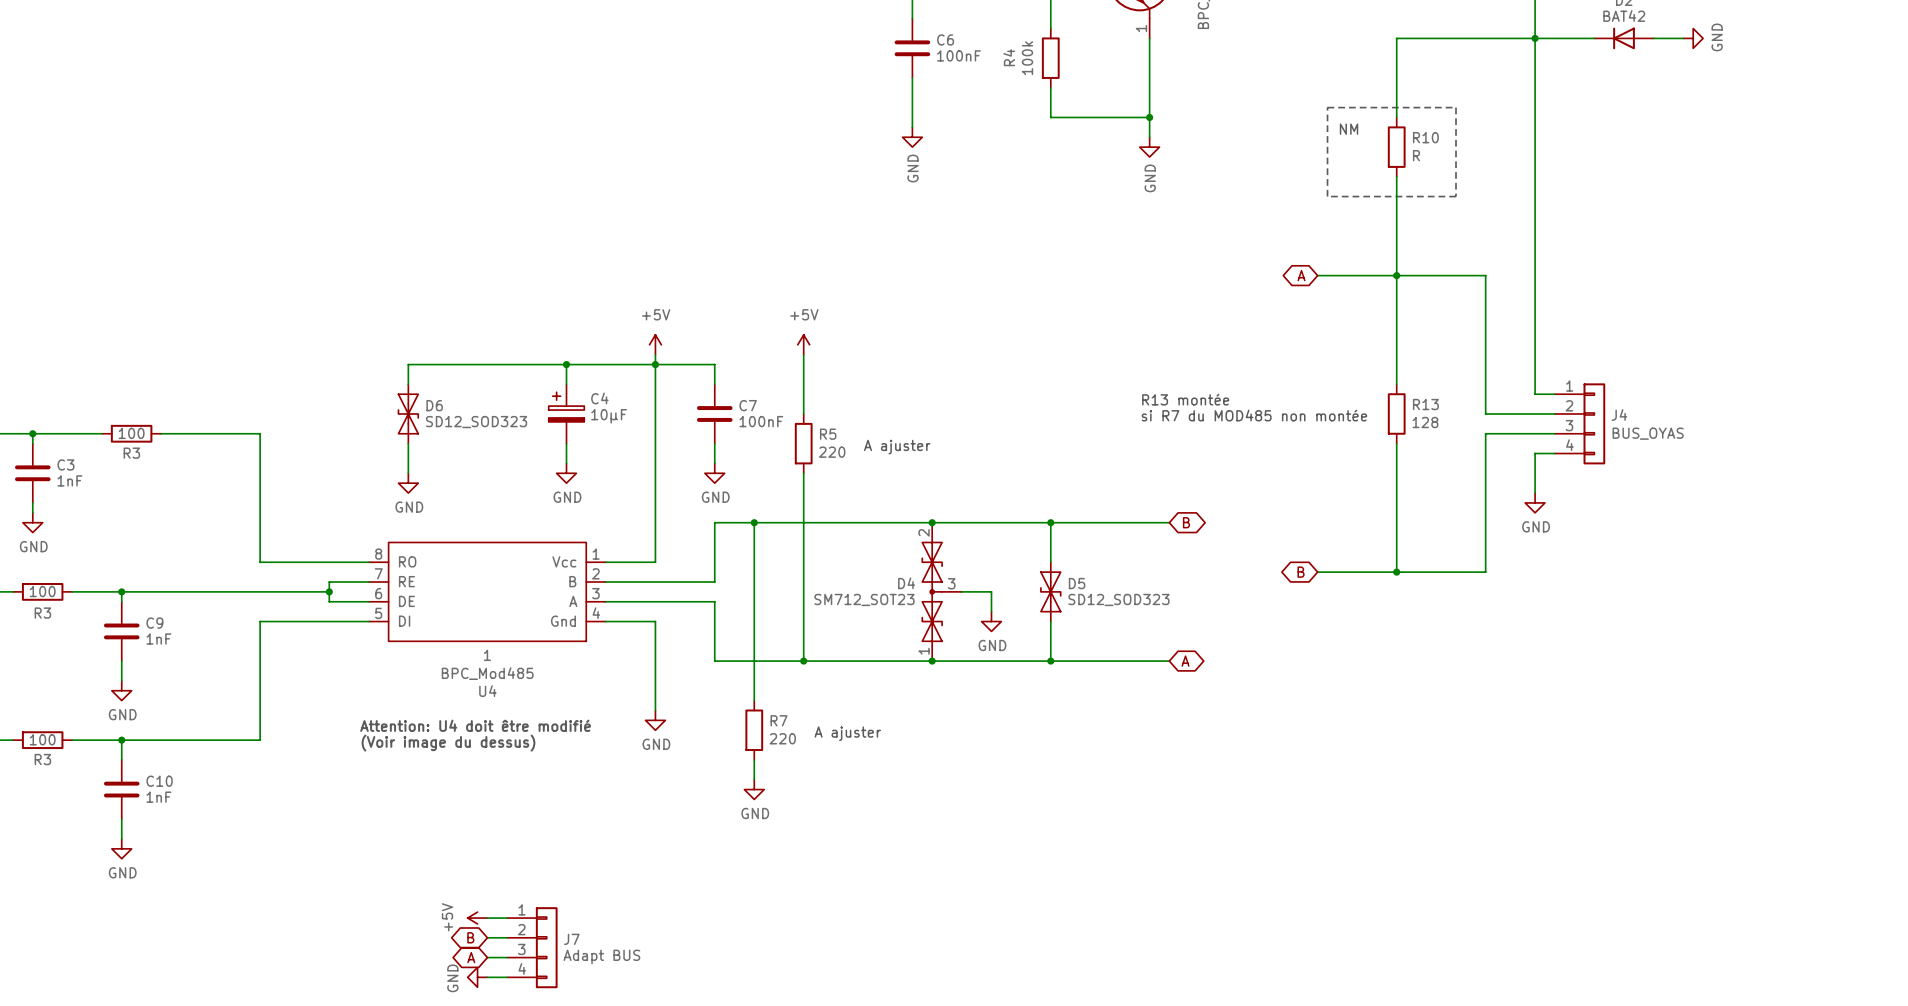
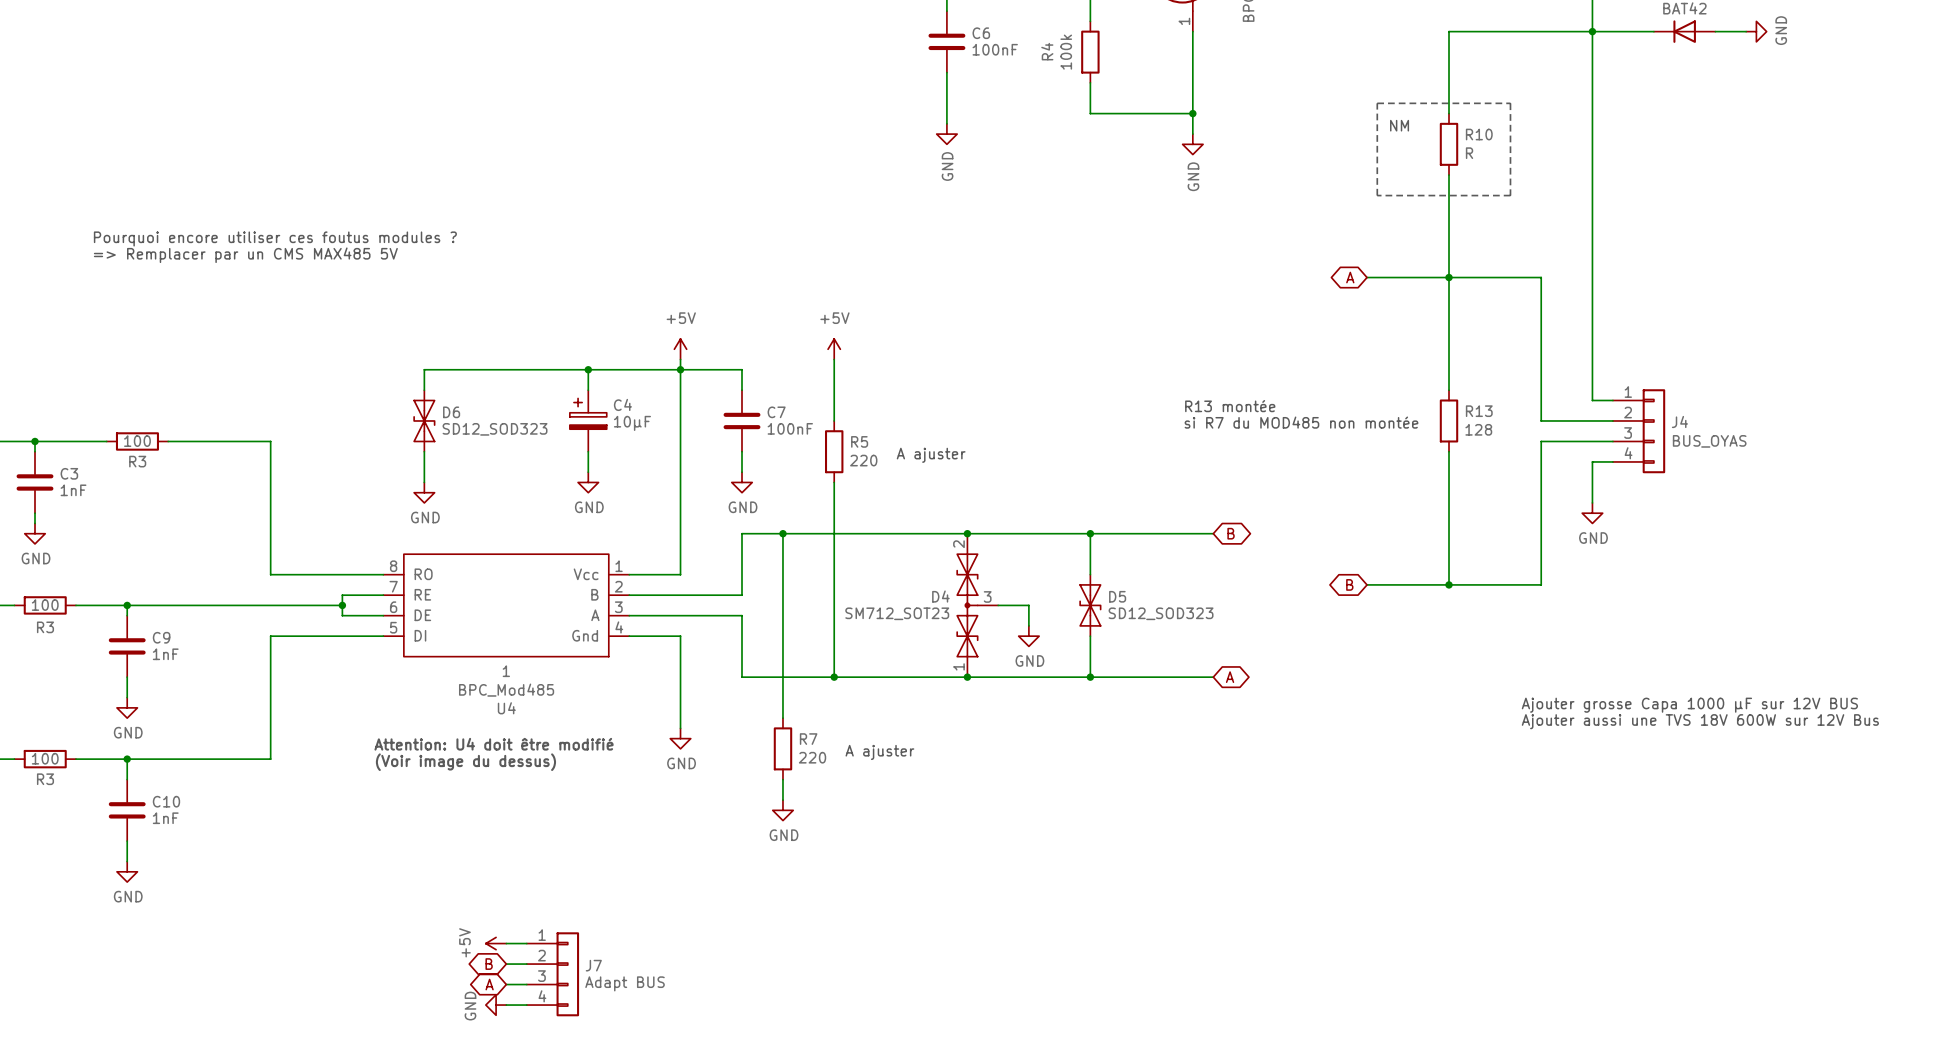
text: none -> Pourquoi encore utiliser ces foutus modules ? (275, 238)
text: none -> => Remplacer par un CMS MAX485 5V (245, 255)
text: none -> Ajouter grosse Capa 1000 µF sur 12V BUS (1689, 705)
text: none -> Ajouter aussi une TVS 18V 600W sur 12V Bus (1700, 721)

